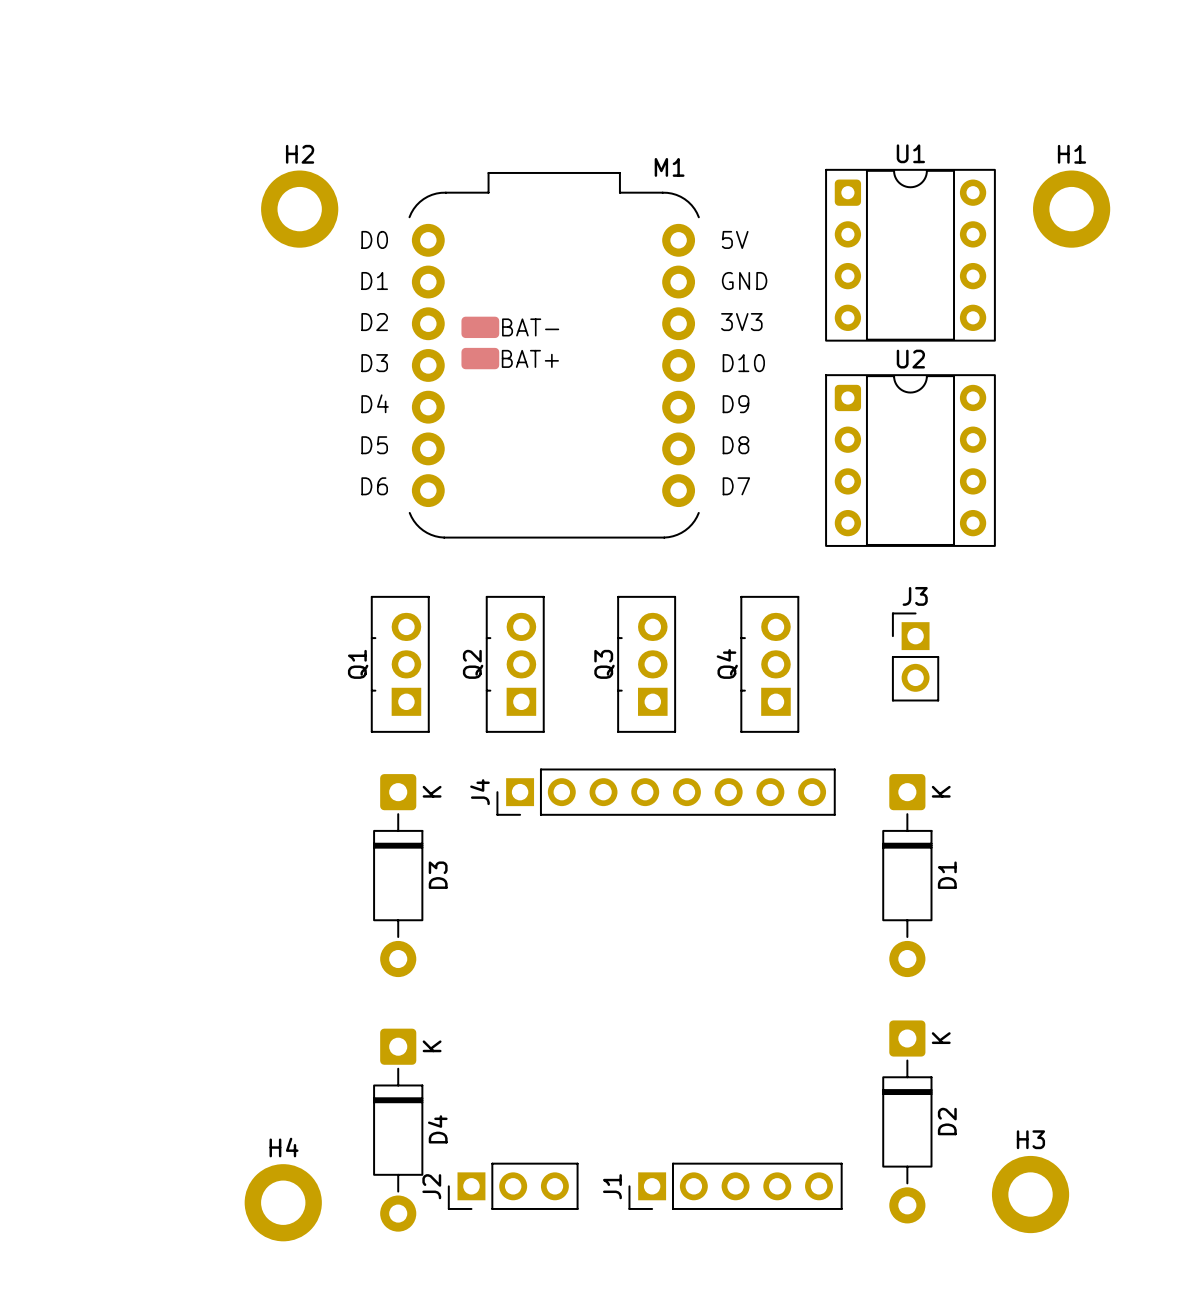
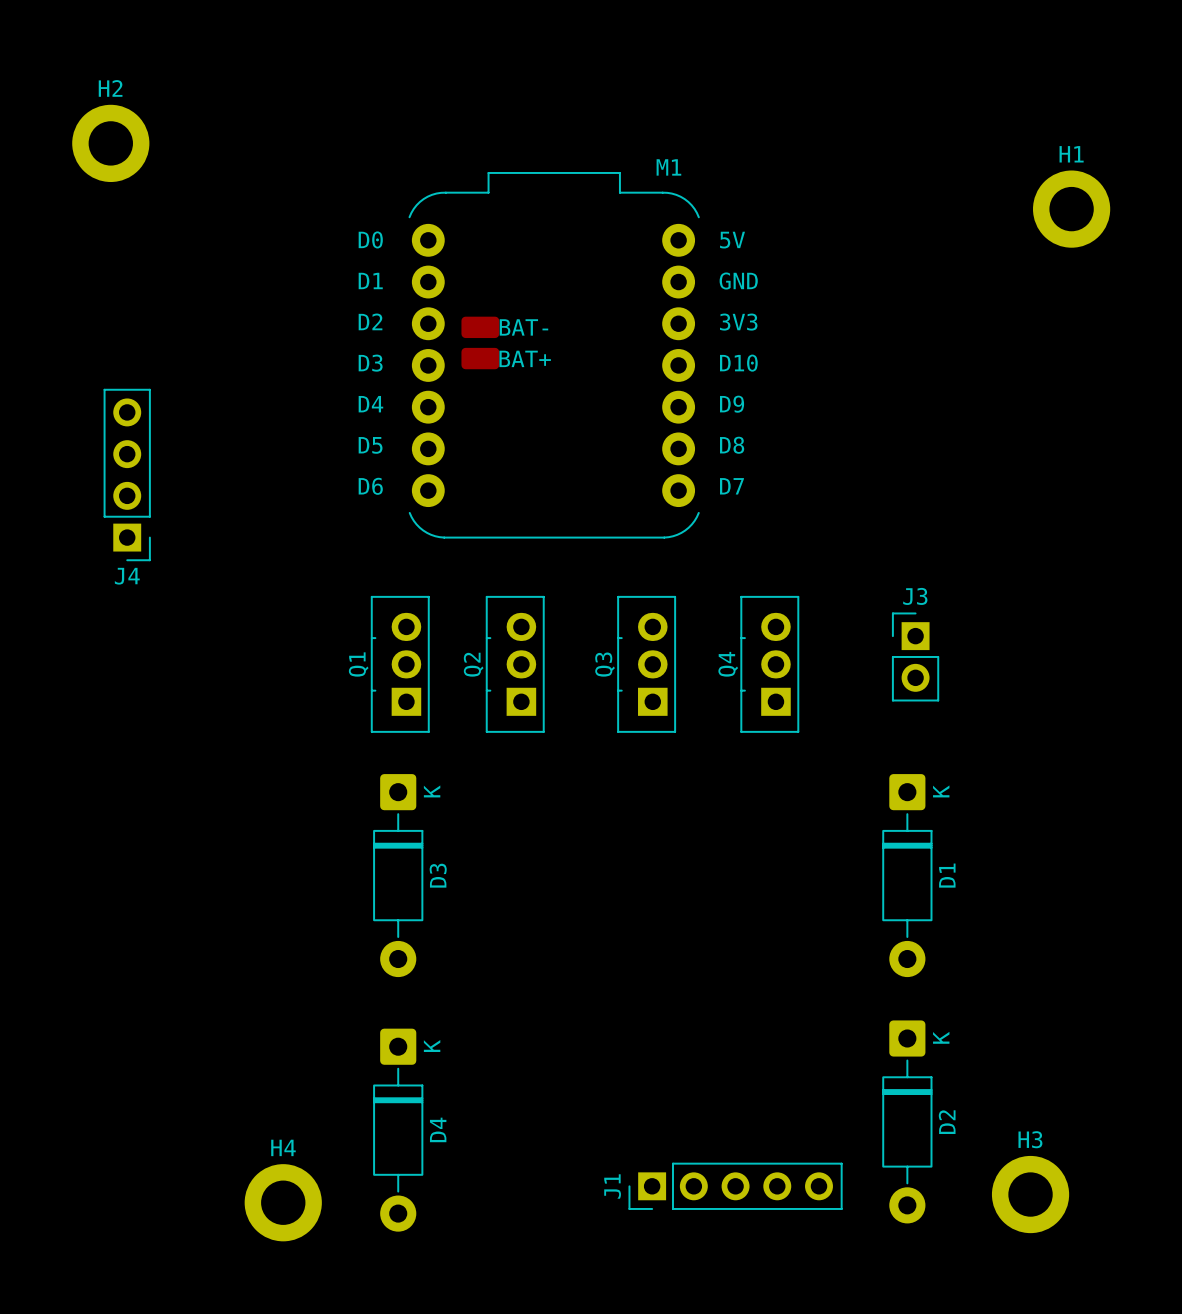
H2 position: (299, 209) -> (110, 143)
U1: (910, 255) -> none
U2: (910, 460) -> none
J4 footprint: [496, 768, 836, 816] -> [103, 388, 151, 562]
J4 name position: J4 (479, 792) -> J4 (127, 576)
J2: (513, 1186) -> none

